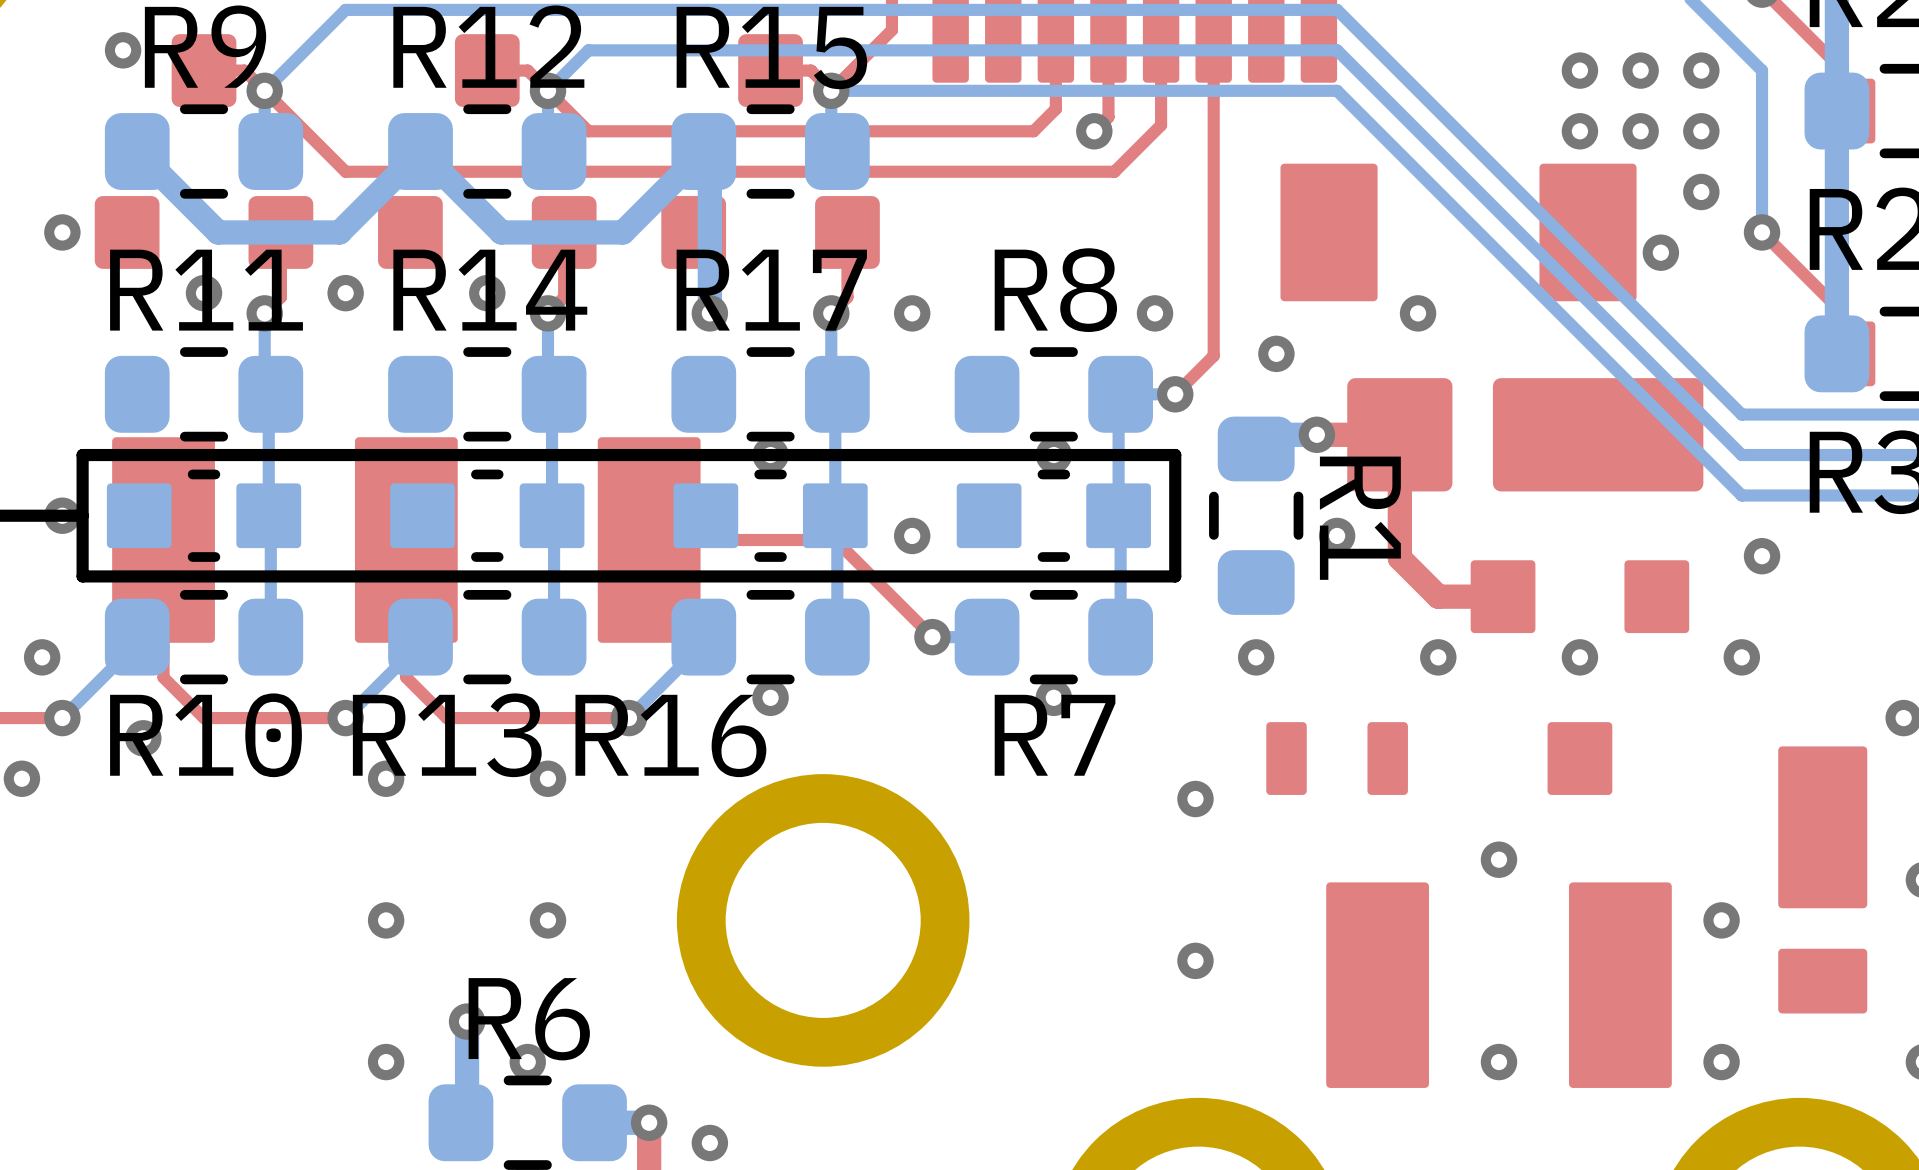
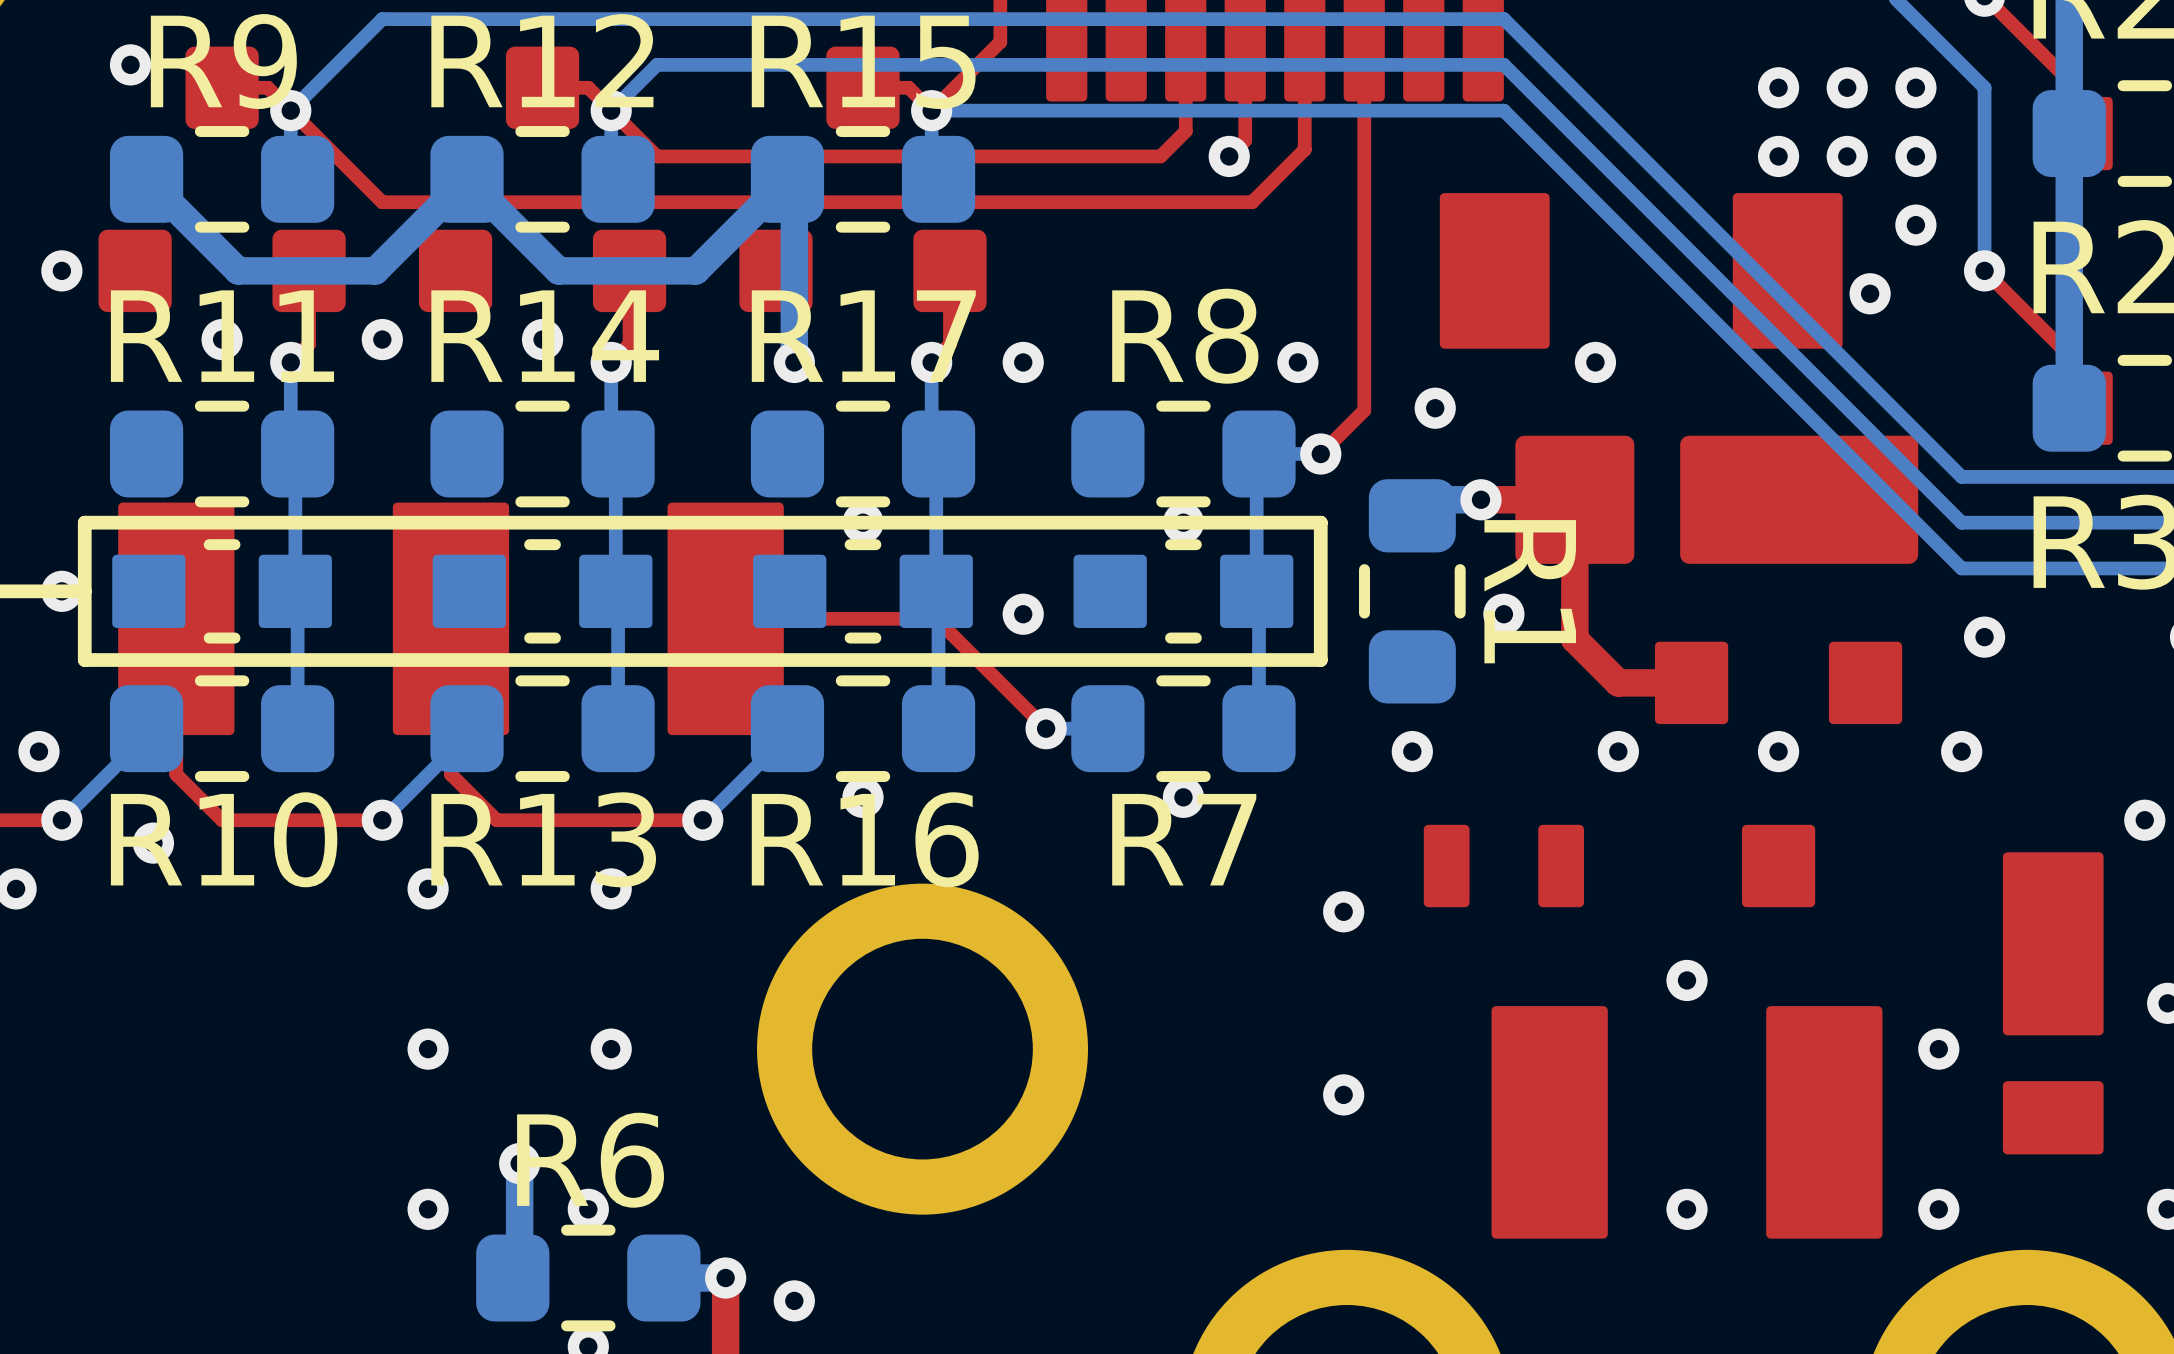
R13 name position: R13 (447, 735) -> R13 (543, 839)
R16 name position: R16 (670, 735) -> R16 (865, 839)

